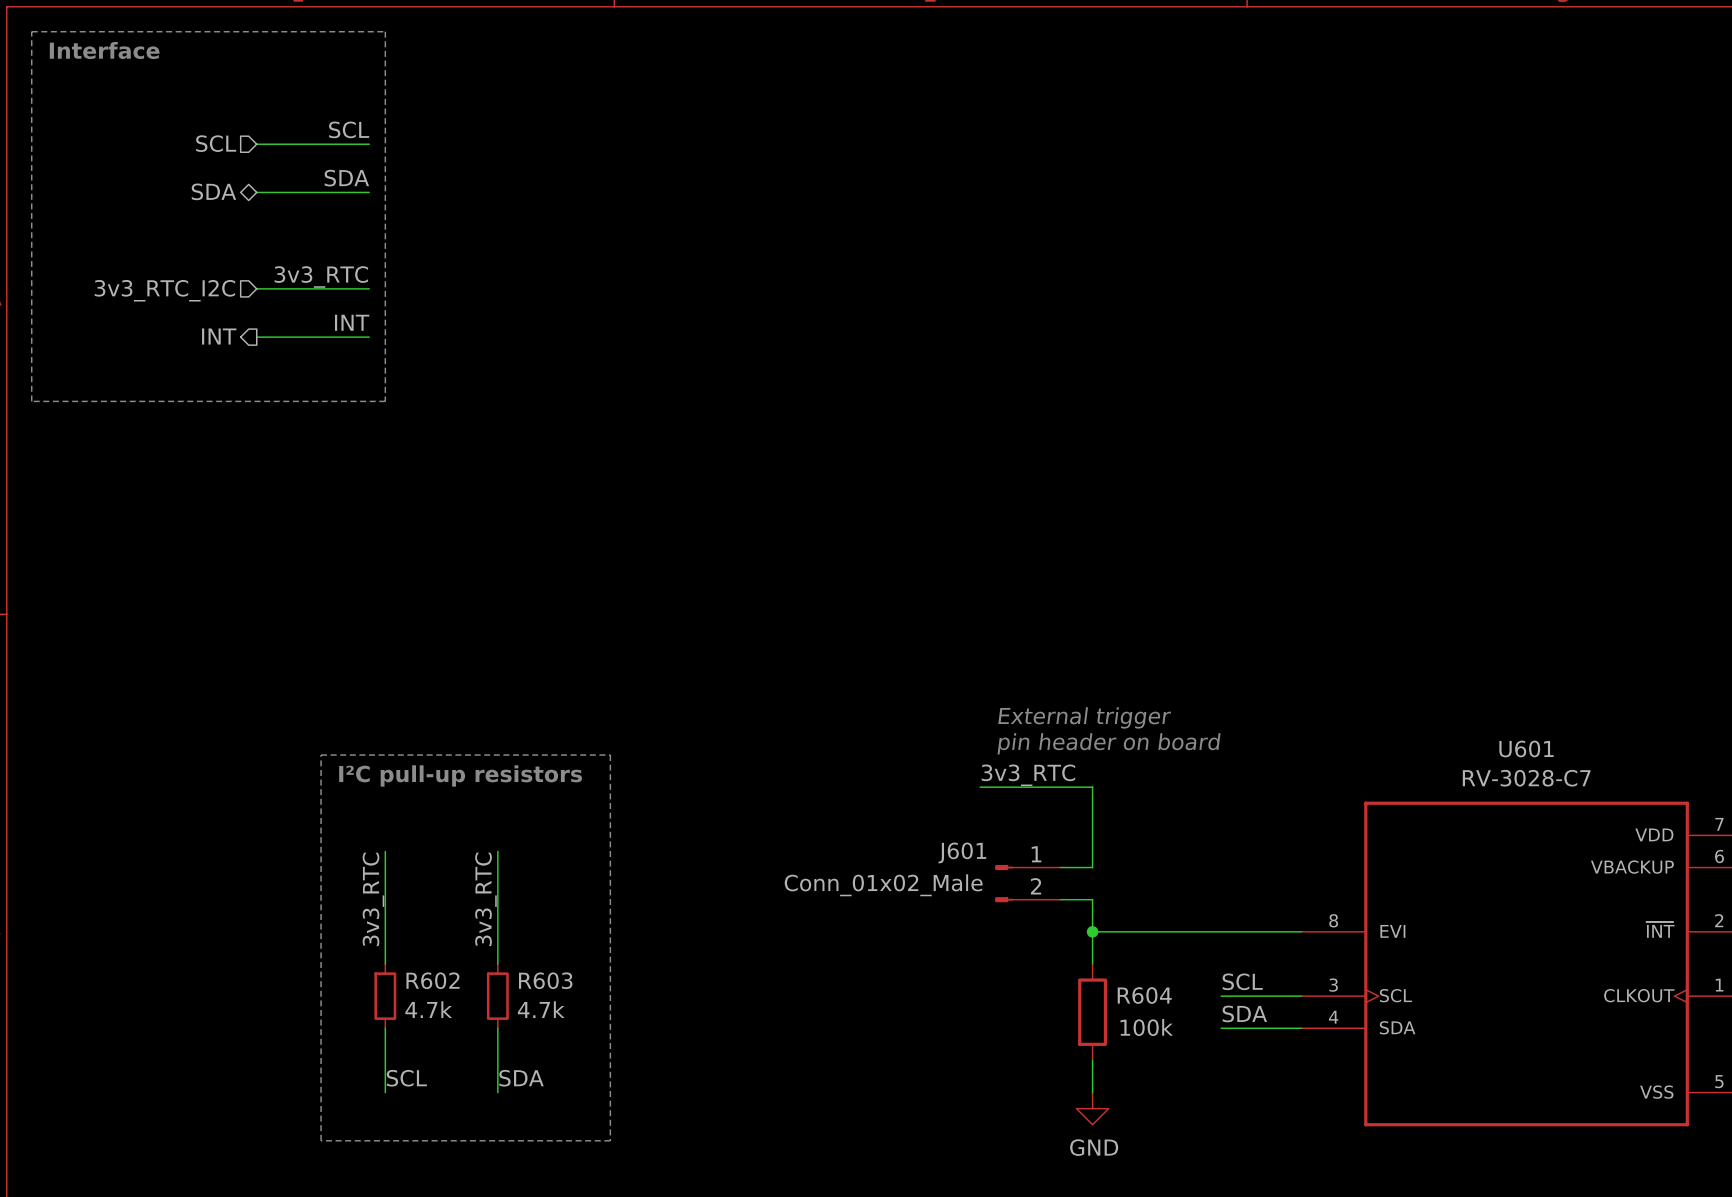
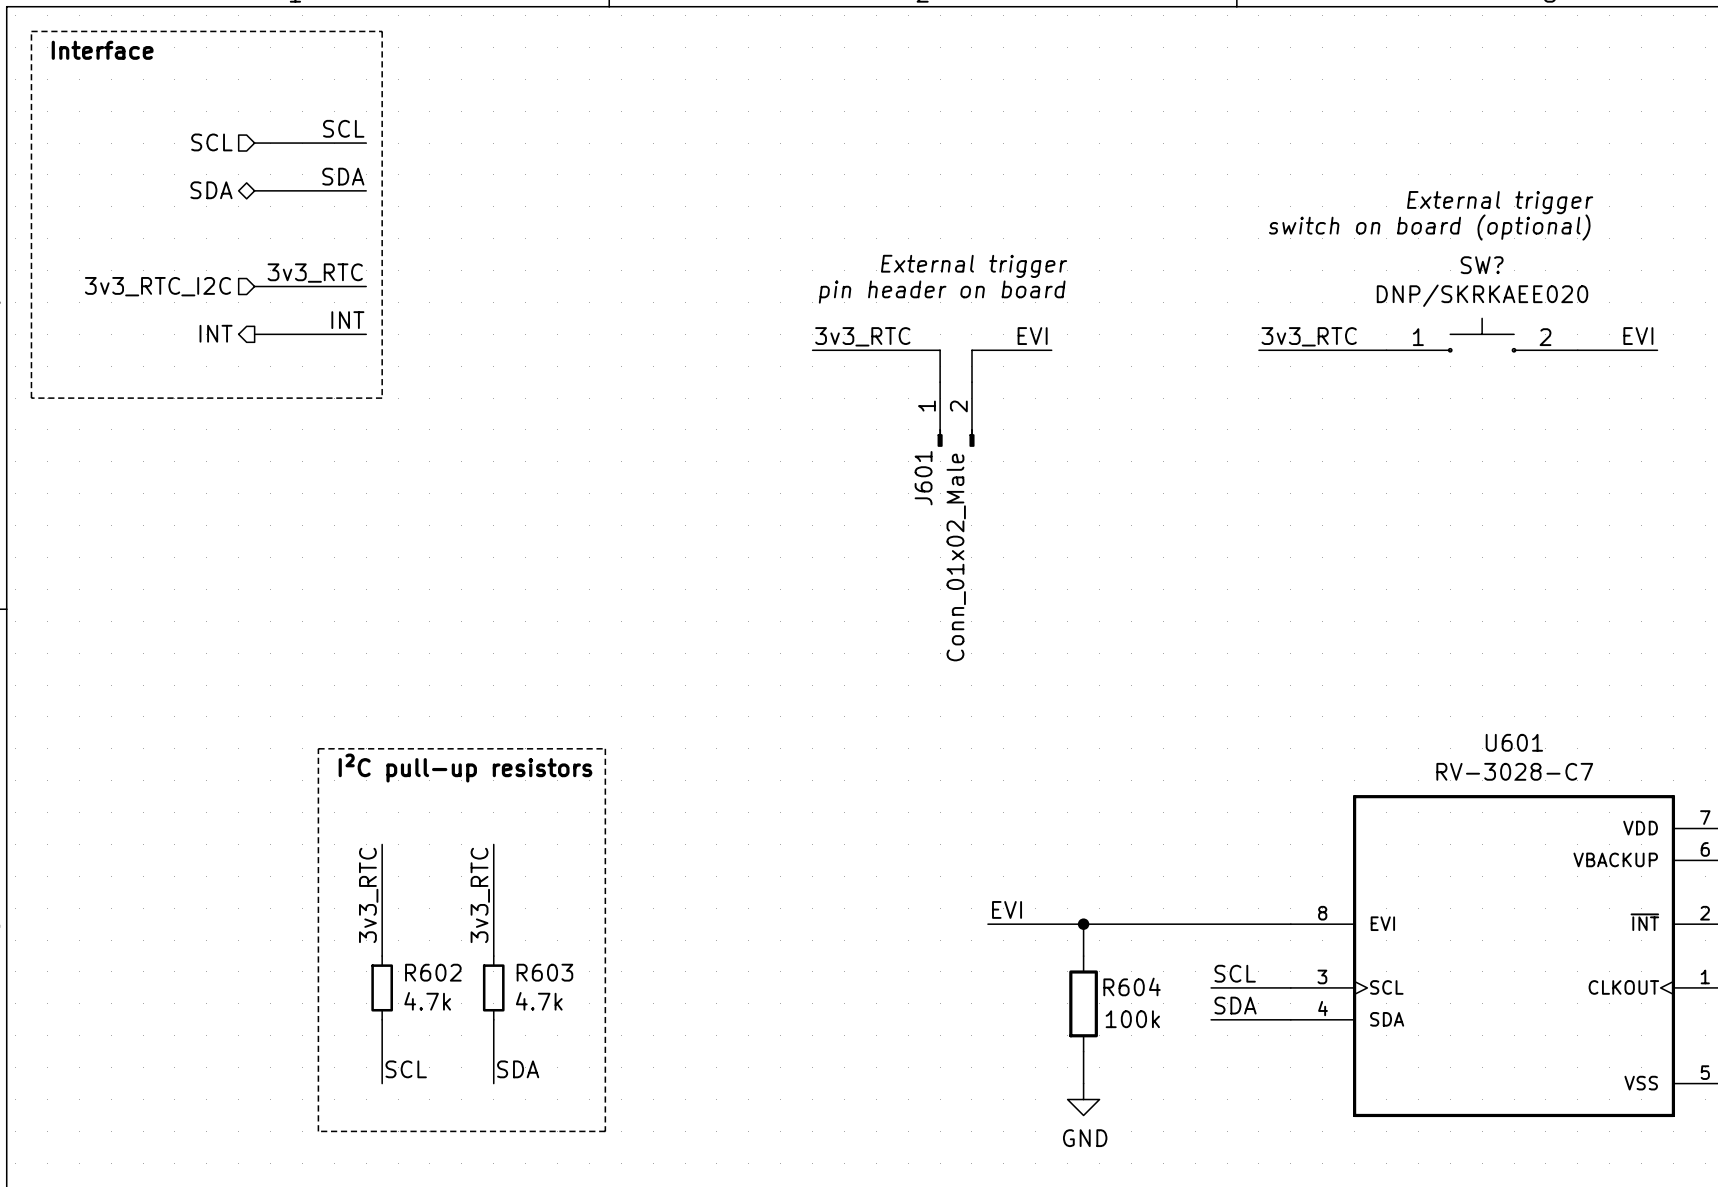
text: none -> External trigger (1500, 202)
text: none -> switch on board (optional) (1429, 227)
text: none -> External trigger (974, 266)
text: none -> pin header on board (942, 292)
SW?: none -> DNP/SKRKAEE020 (1482, 335)
label: none -> EVI (1032, 336)
label: none -> EVI (1638, 336)
label: none -> 3v3_RTC (862, 336)
label: none -> 3v3_RTC (1309, 336)
wire: none -> (812, 350) (940, 350) (940, 382)
wire: none -> (1051, 350) (971, 350) (971, 382)
wire: none -> (1258, 350) (1386, 350)
wire: none -> (1577, 350) (1657, 350)
text: External trigger (1084, 717) -> none
text: pin header on board (1109, 743) -> none
label: 3v3_RTC (1028, 775) -> none
wire: (980, 787) (1092, 787) (1092, 867) (1060, 867) -> none
J601 rotation: 0° (1004, 883) -> 90° counterclockwise (956, 437)
J601 position: (1027, 883) -> (956, 414)
wire: (1060, 899) (1092, 899) (1092, 931) -> (987, 924) (1083, 924)
label: none -> EVI (1007, 909)

